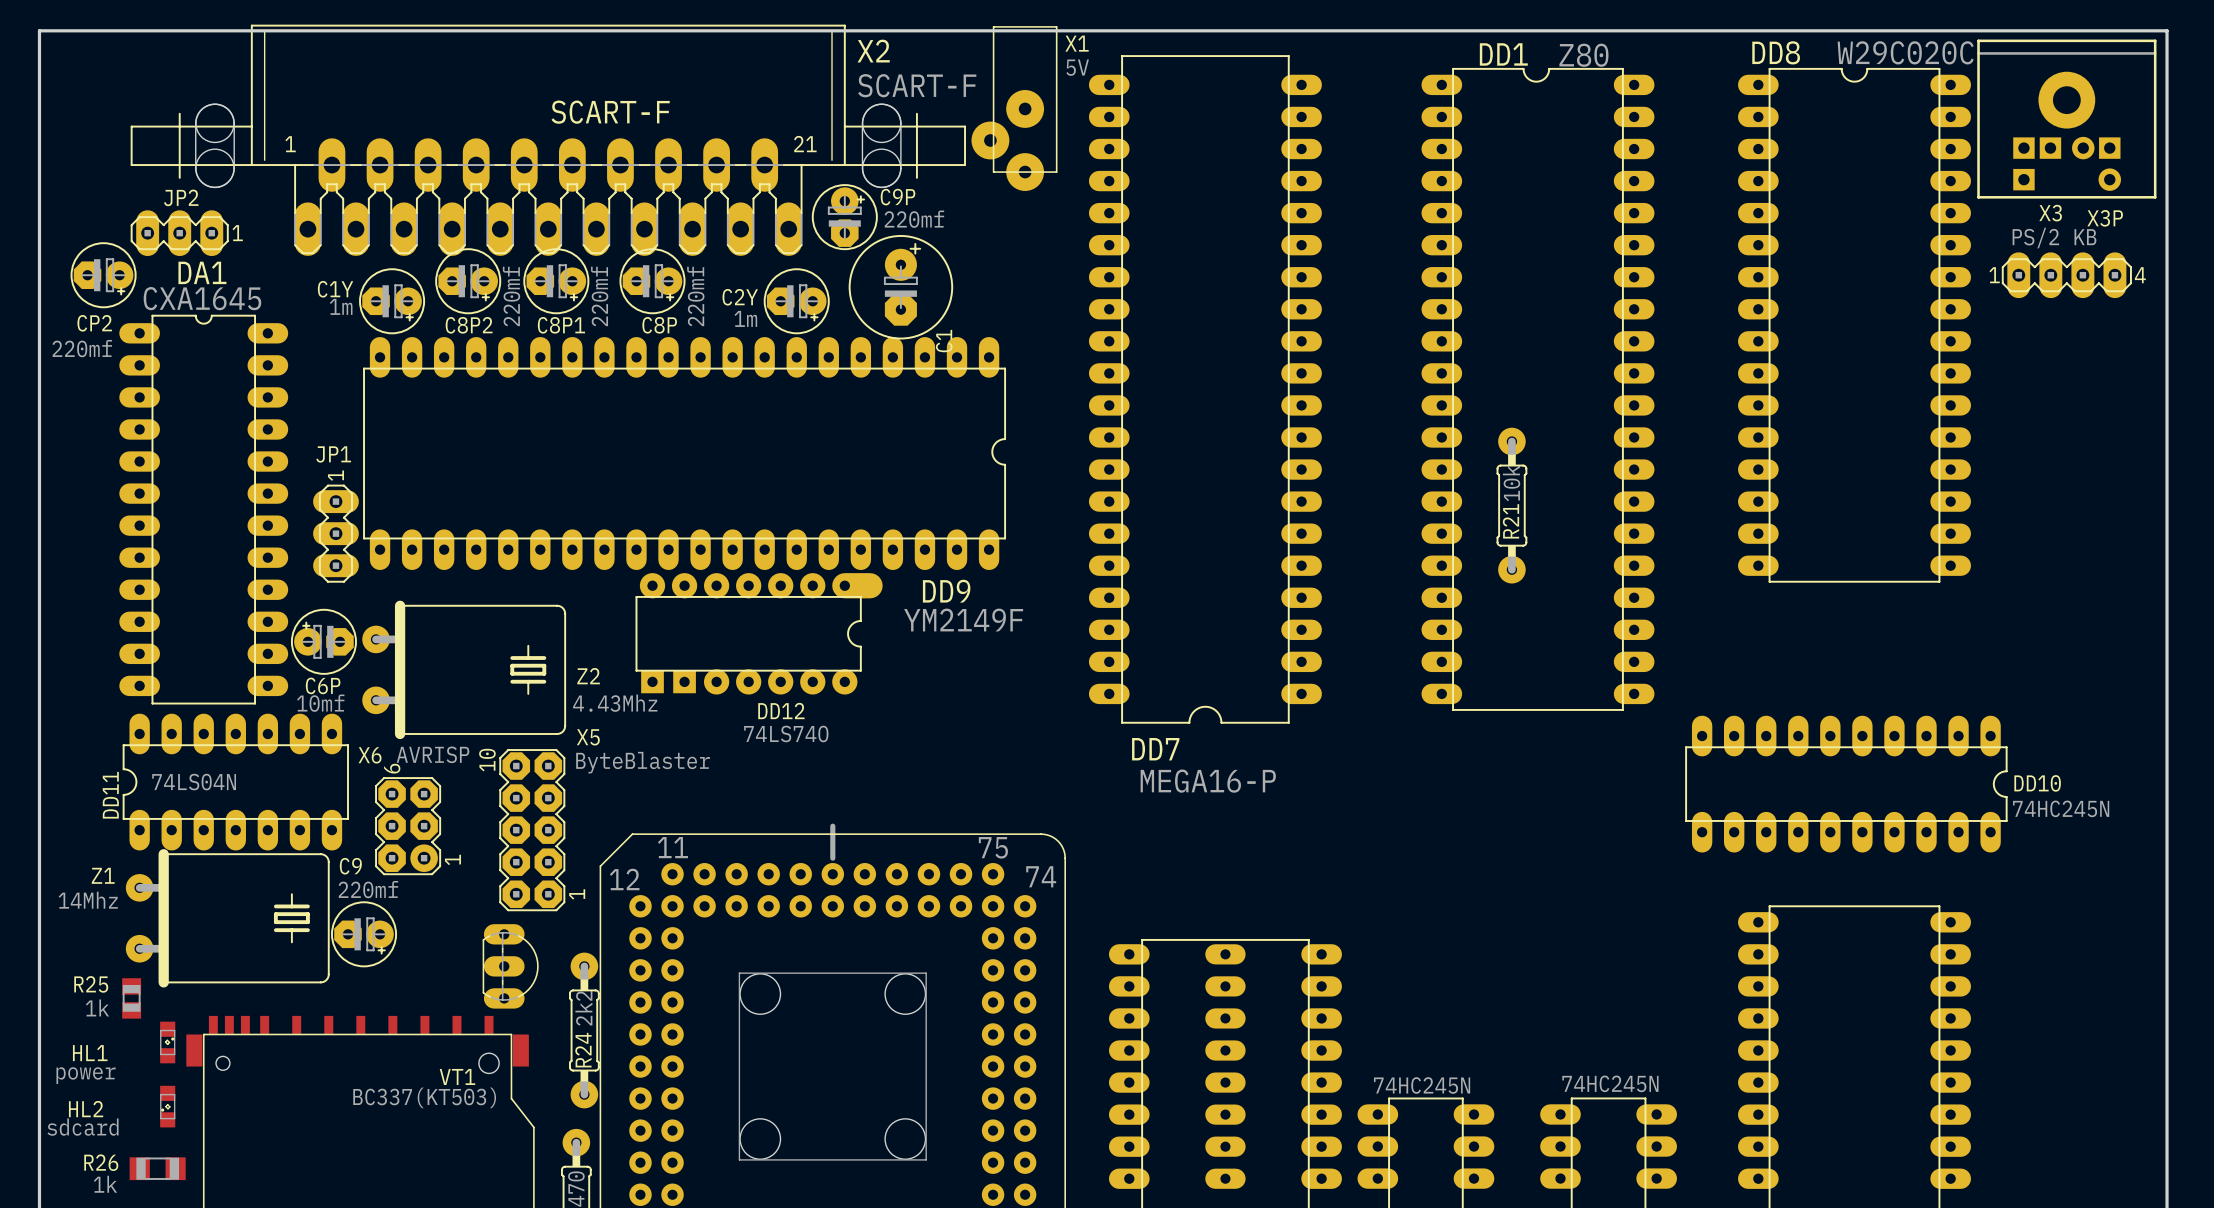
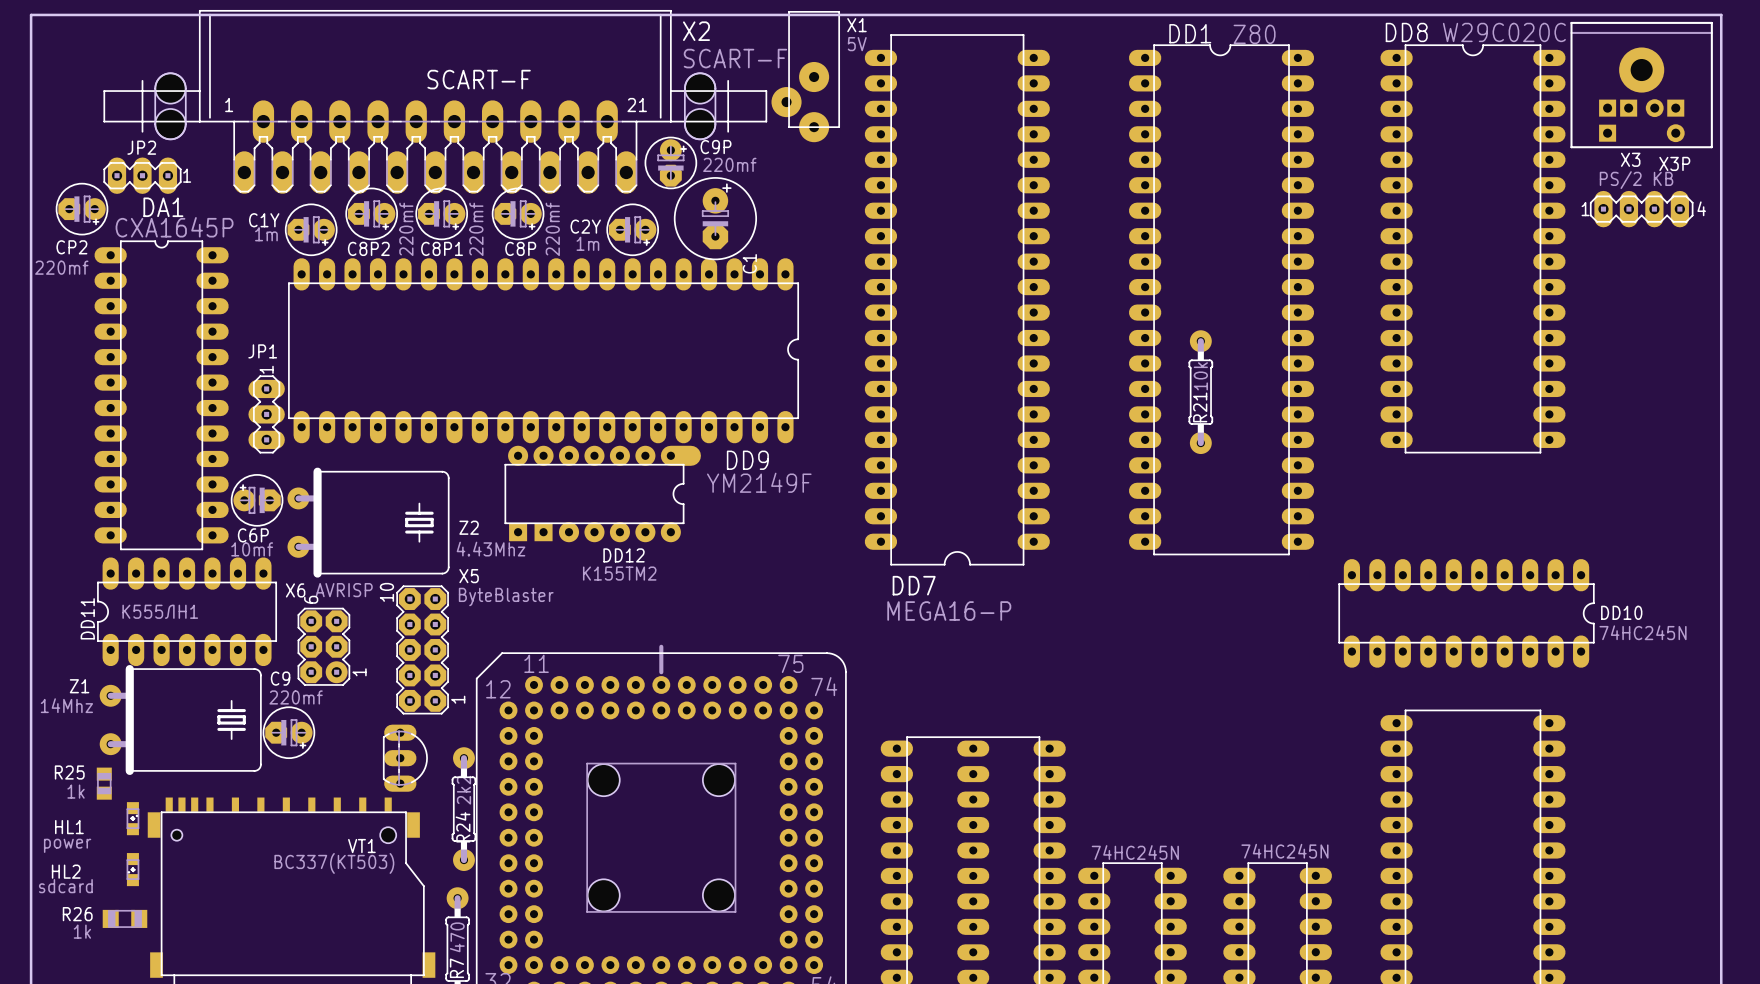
DA1 value: CXA1645 (202, 298) -> CXA1645P (174, 227)
DD12 value: 74LS74O (786, 733) -> К155ТМ2 (619, 573)
DD11 value: 74LS04N (194, 782) -> К555ЛН1 (160, 611)

